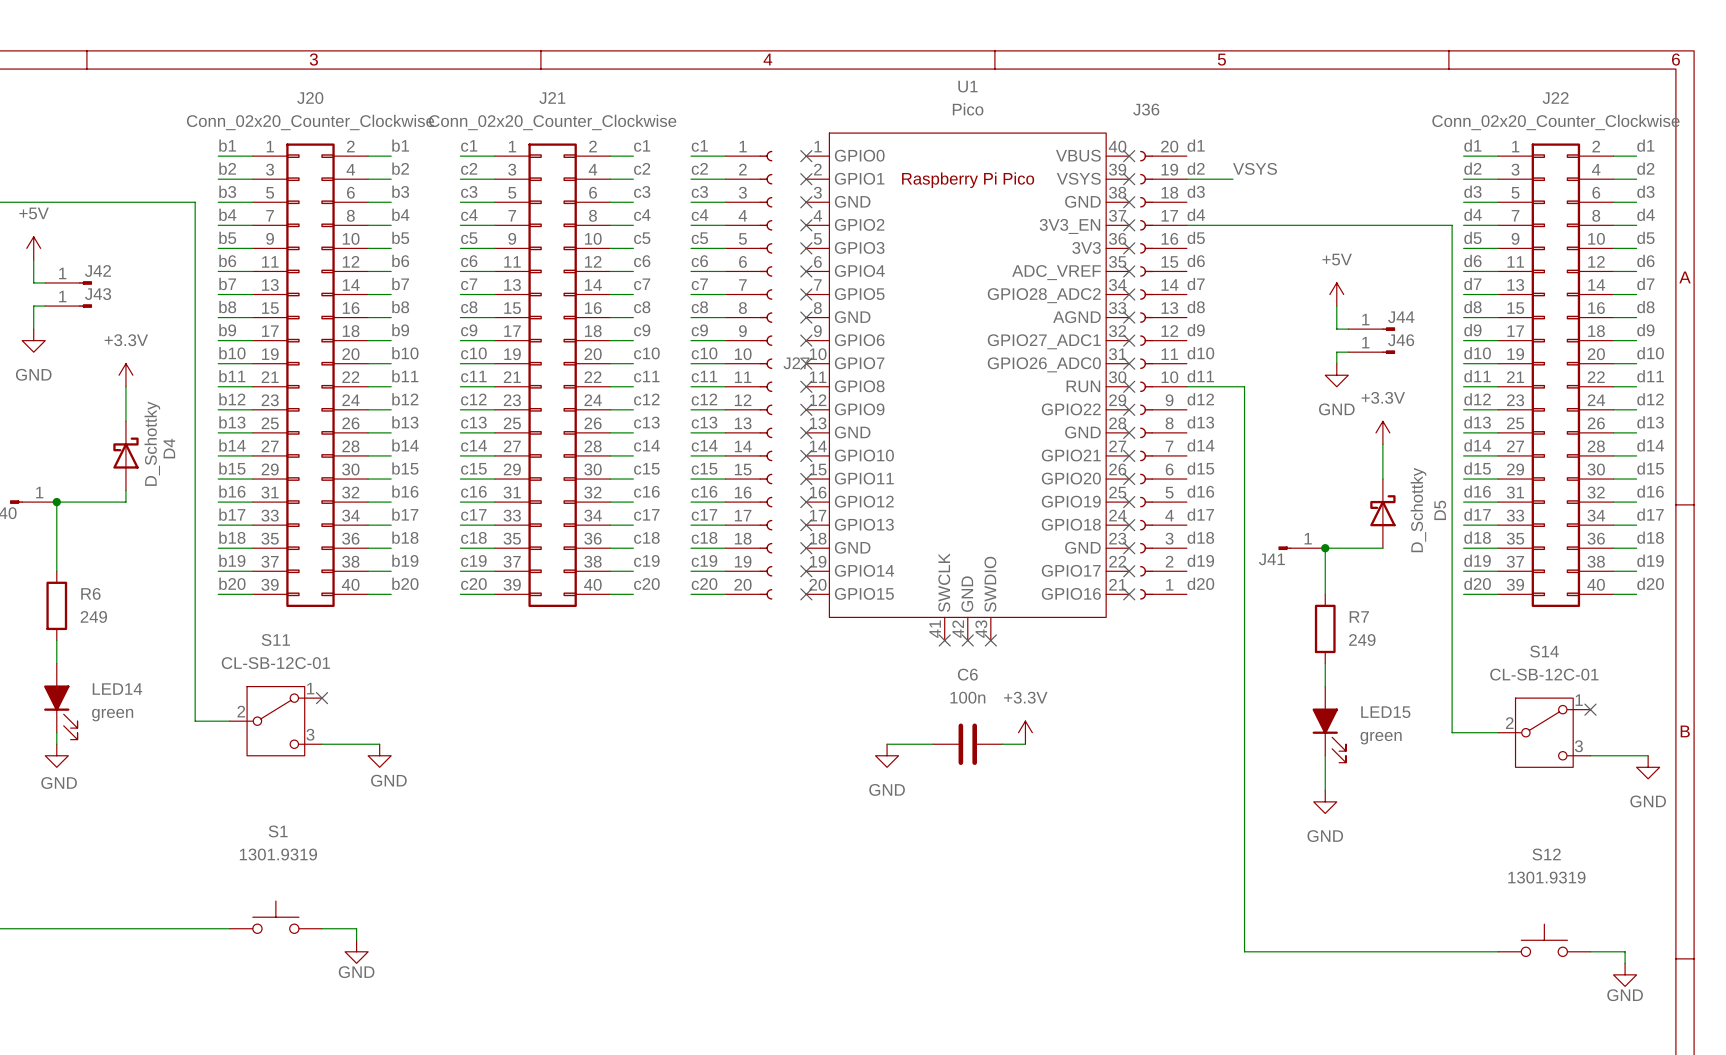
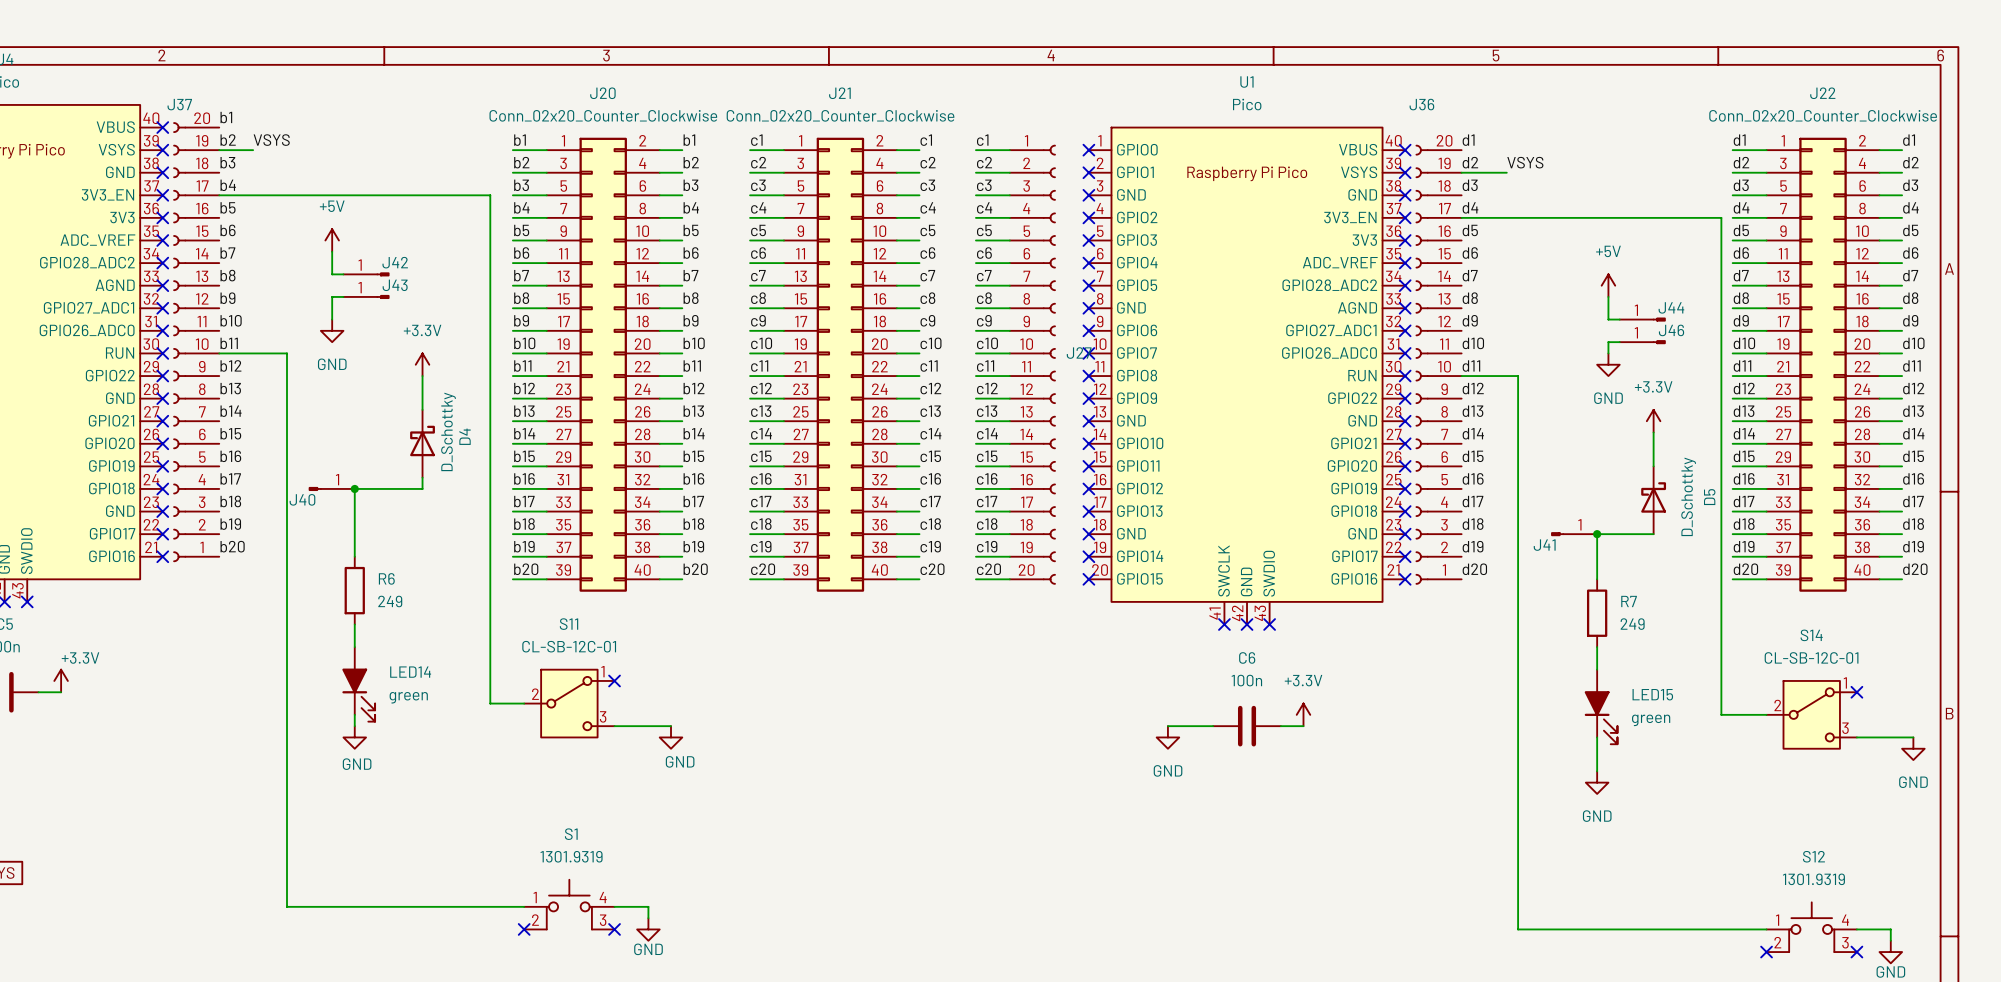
S1 symbol: [229, 901, 323, 934] -> [524, 879, 615, 930]
S12 symbol: [1498, 924, 1591, 957] -> [1766, 902, 1857, 953]
no-connect mark: none -> (524, 929)
no-connect mark: none -> (614, 929)
no-connect mark: none -> (1766, 952)
no-connect mark: none -> (1856, 952)

